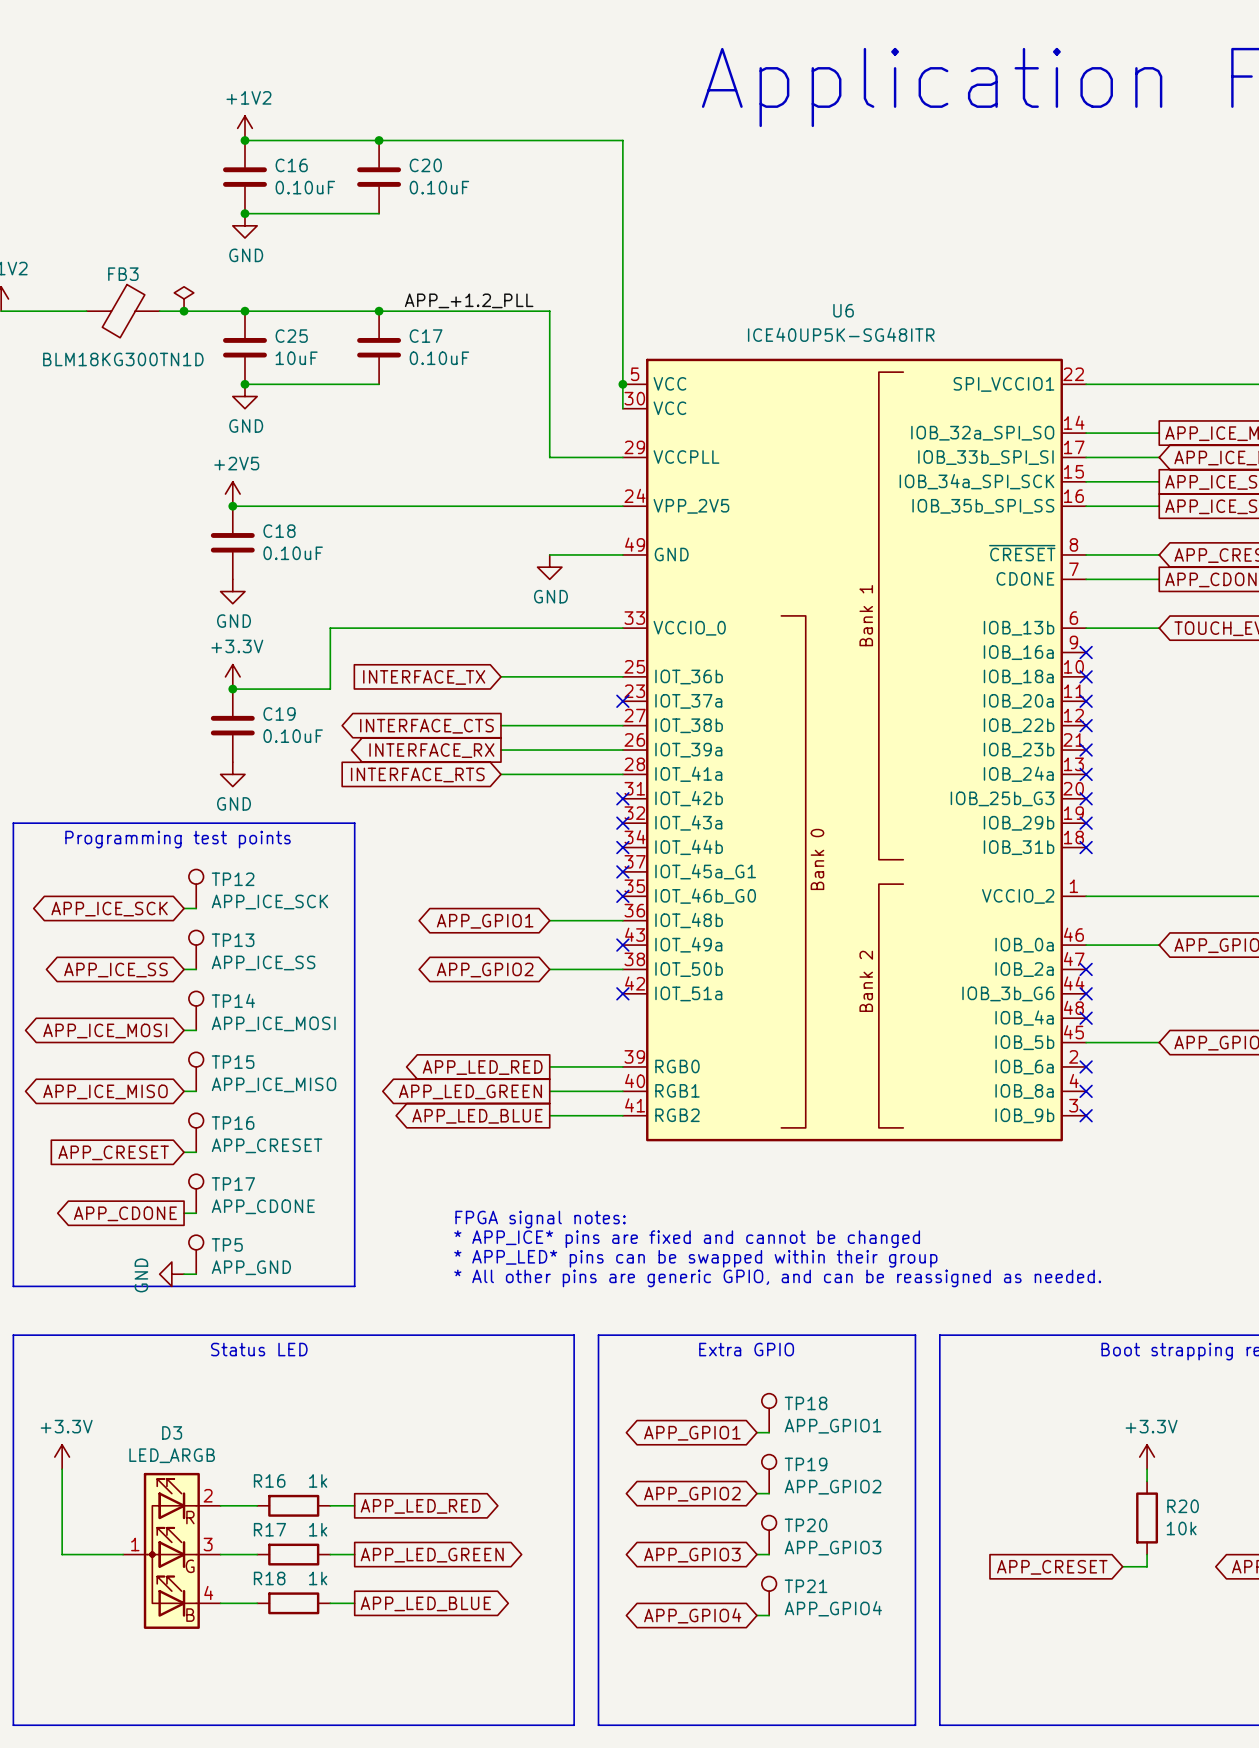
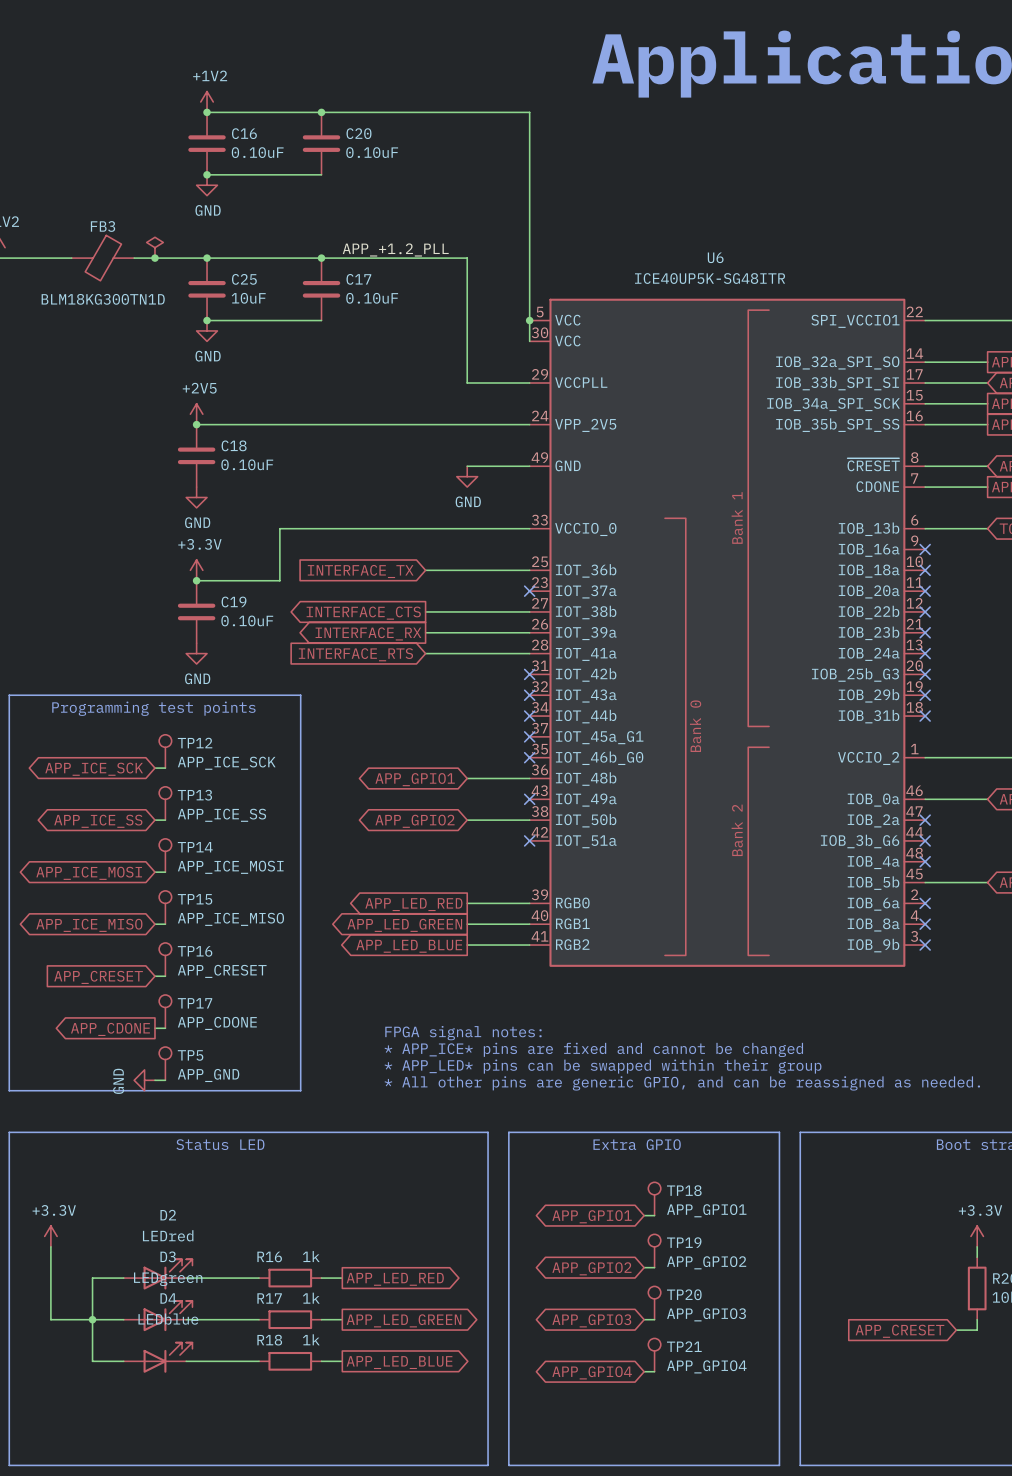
D3 name position: D3 (172, 1432) -> D3 (168, 1256)
D3 value: LED_ARGB (172, 1455) -> LEDgreen (168, 1279)
D3 symbol: [123, 1472, 221, 1629] -> [123, 1300, 193, 1332]
D2: none -> LEDred (158, 1274)
wire: none -> (123, 1278) (92, 1278) (92, 1361) (123, 1361)
wire: none -> (217, 1278) (259, 1278)
R16 position: (293, 1505) -> (290, 1278)
wire: (330, 1505) (354, 1505) -> (321, 1278) (342, 1278)
global label position: APP_LED_RED (420, 1506) -> APP_LED_RED (395, 1279)
junction: none -> (92, 1319)
wire: none -> (217, 1319) (259, 1319)
R17 position: (293, 1554) -> (290, 1319)
wire: (330, 1554) (354, 1554) -> (321, 1319) (342, 1319)
global label position: APP_LED_GREEN (432, 1555) -> APP_LED_GREEN (404, 1320)
D4: none -> LEDblue (158, 1357)
wire: none -> (217, 1361) (259, 1361)
R18 position: (293, 1603) -> (290, 1361)
wire: (330, 1603) (354, 1603) -> (321, 1361) (342, 1361)
global label position: APP_LED_BLUE (425, 1603) -> APP_LED_BLUE (399, 1362)

